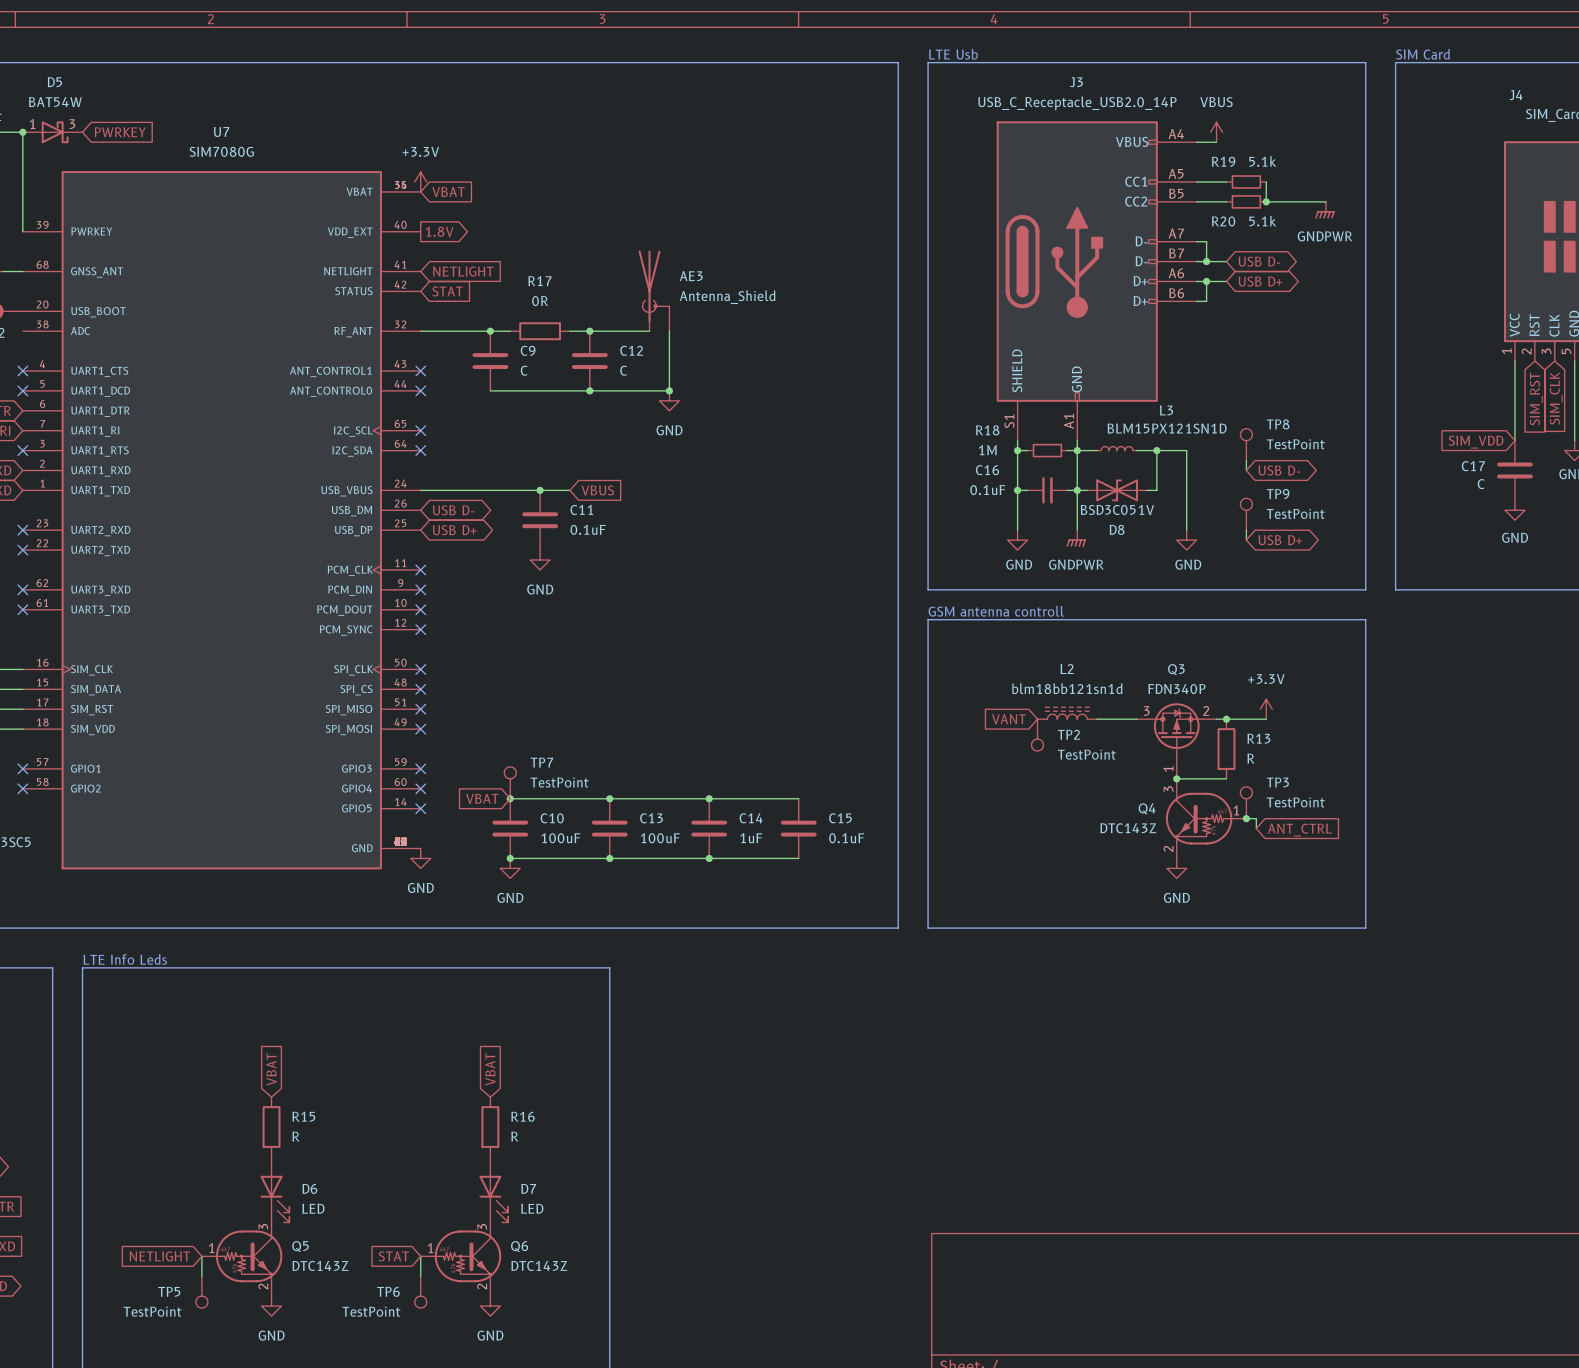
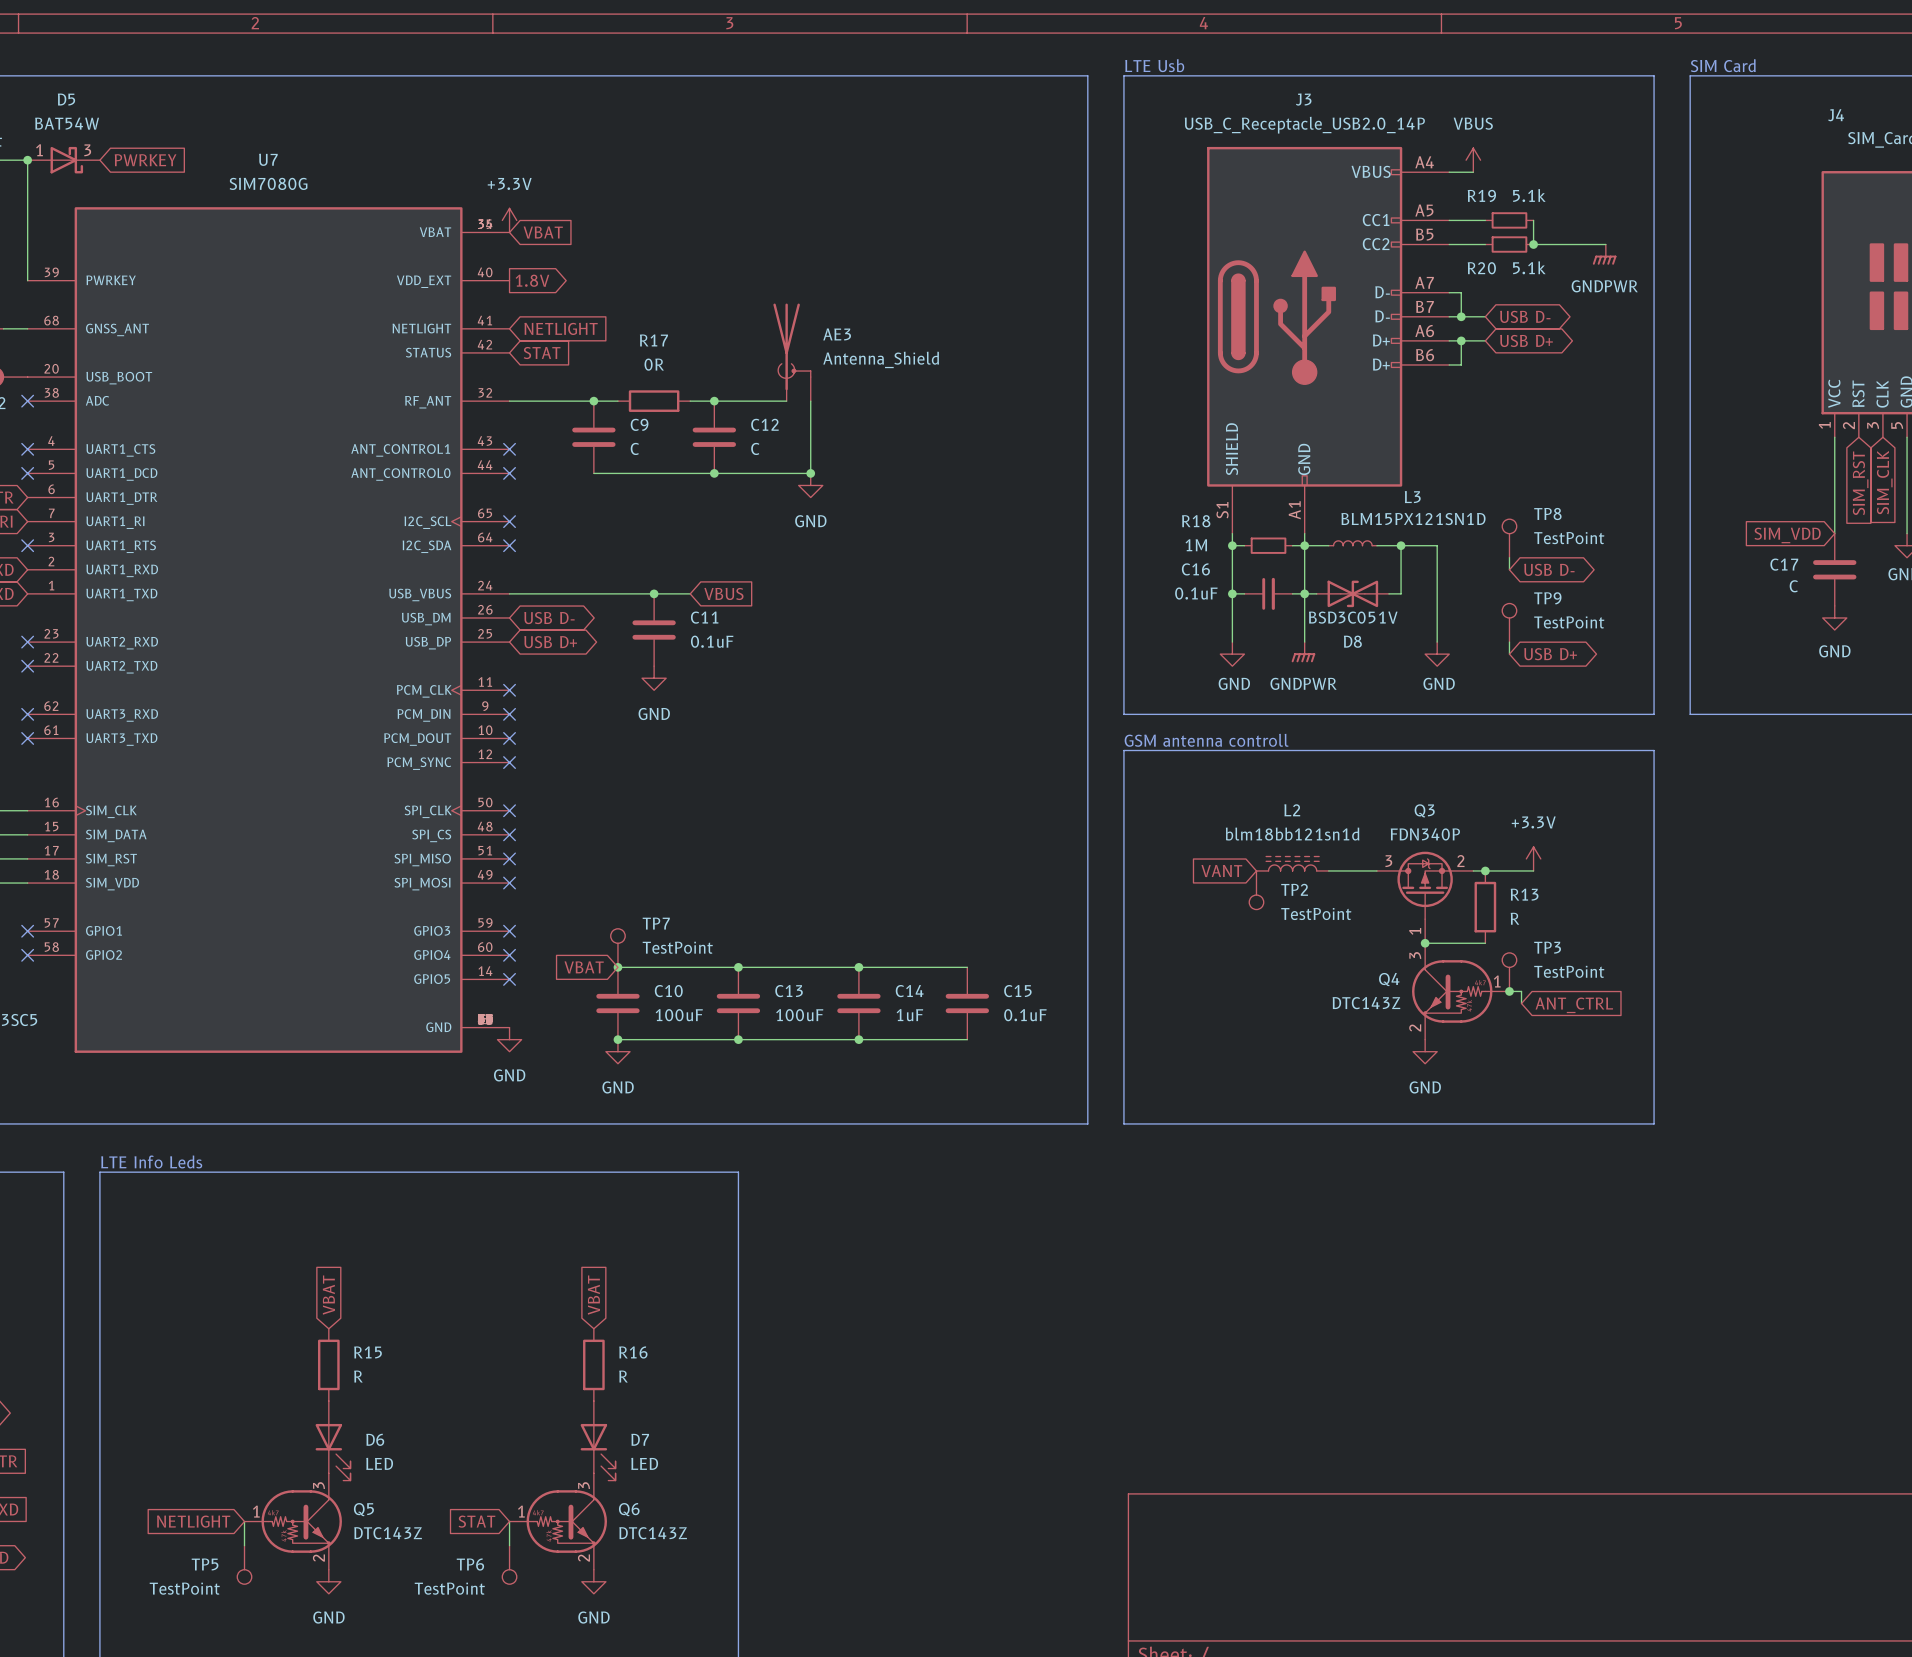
no-connect mark: none -> (27, 401)

